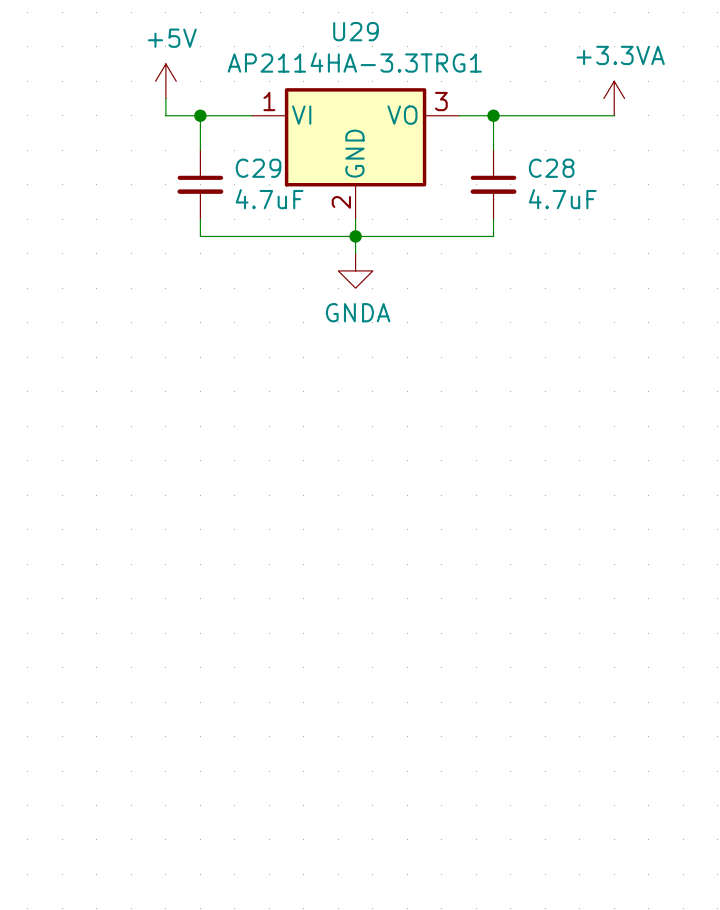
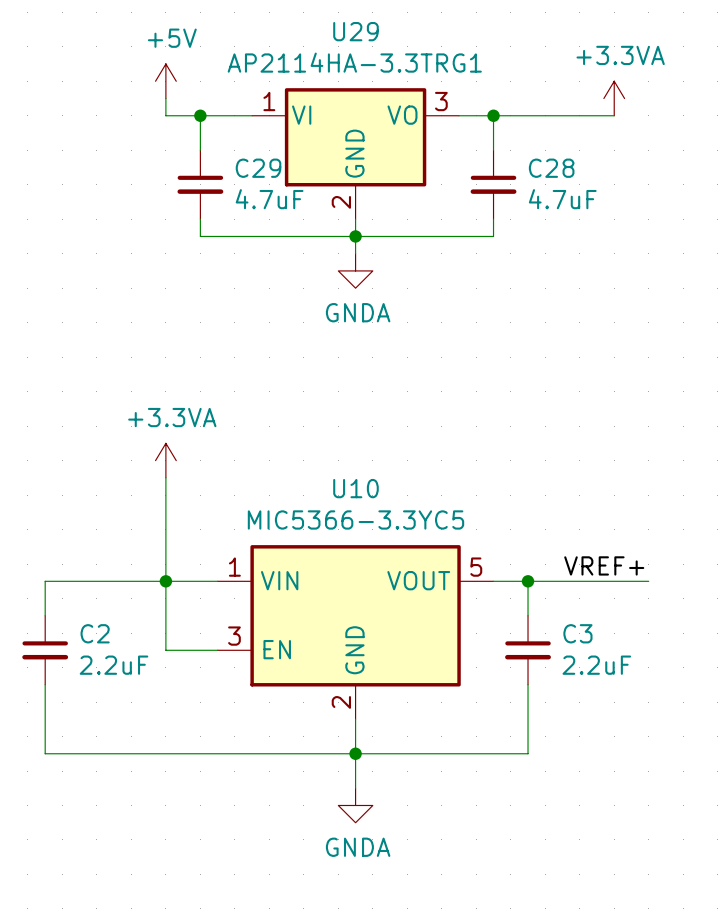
power symbol: none -> +3.3VA (165, 460)
wire: none -> (165, 477) (165, 650) (217, 650)
label: none -> VREF+ (604, 565)
junction: none -> (165, 581)
wire: none -> (217, 581) (45, 581) (45, 615)
wire: none -> (493, 581) (648, 581)
wire: none -> (528, 581) (528, 615)
junction: none -> (528, 581)
U10: none -> MIC5366-3.3YC5 (355, 632)
C2: none -> 2.2uF (45, 650)
C3: none -> 2.2uF (528, 650)
wire: none -> (45, 684) (45, 753) (528, 753) (528, 684)
wire: none -> (355, 719) (355, 788)
junction: none -> (355, 753)
power symbol: none -> GNDA (355, 805)

